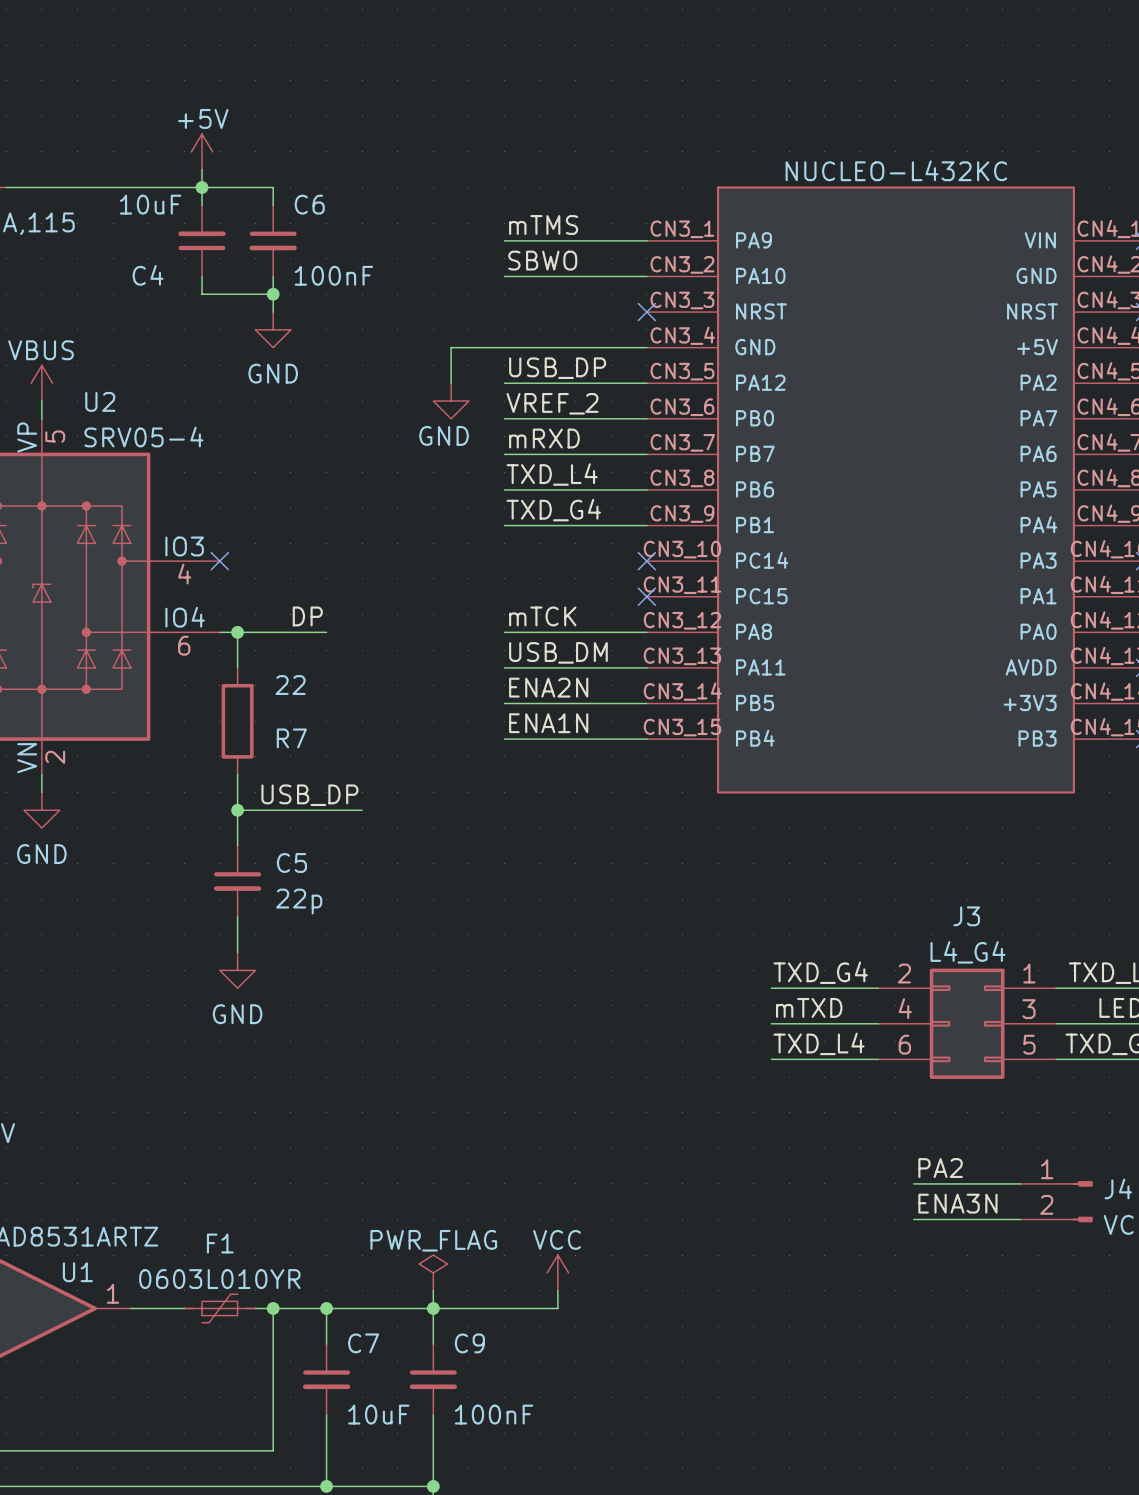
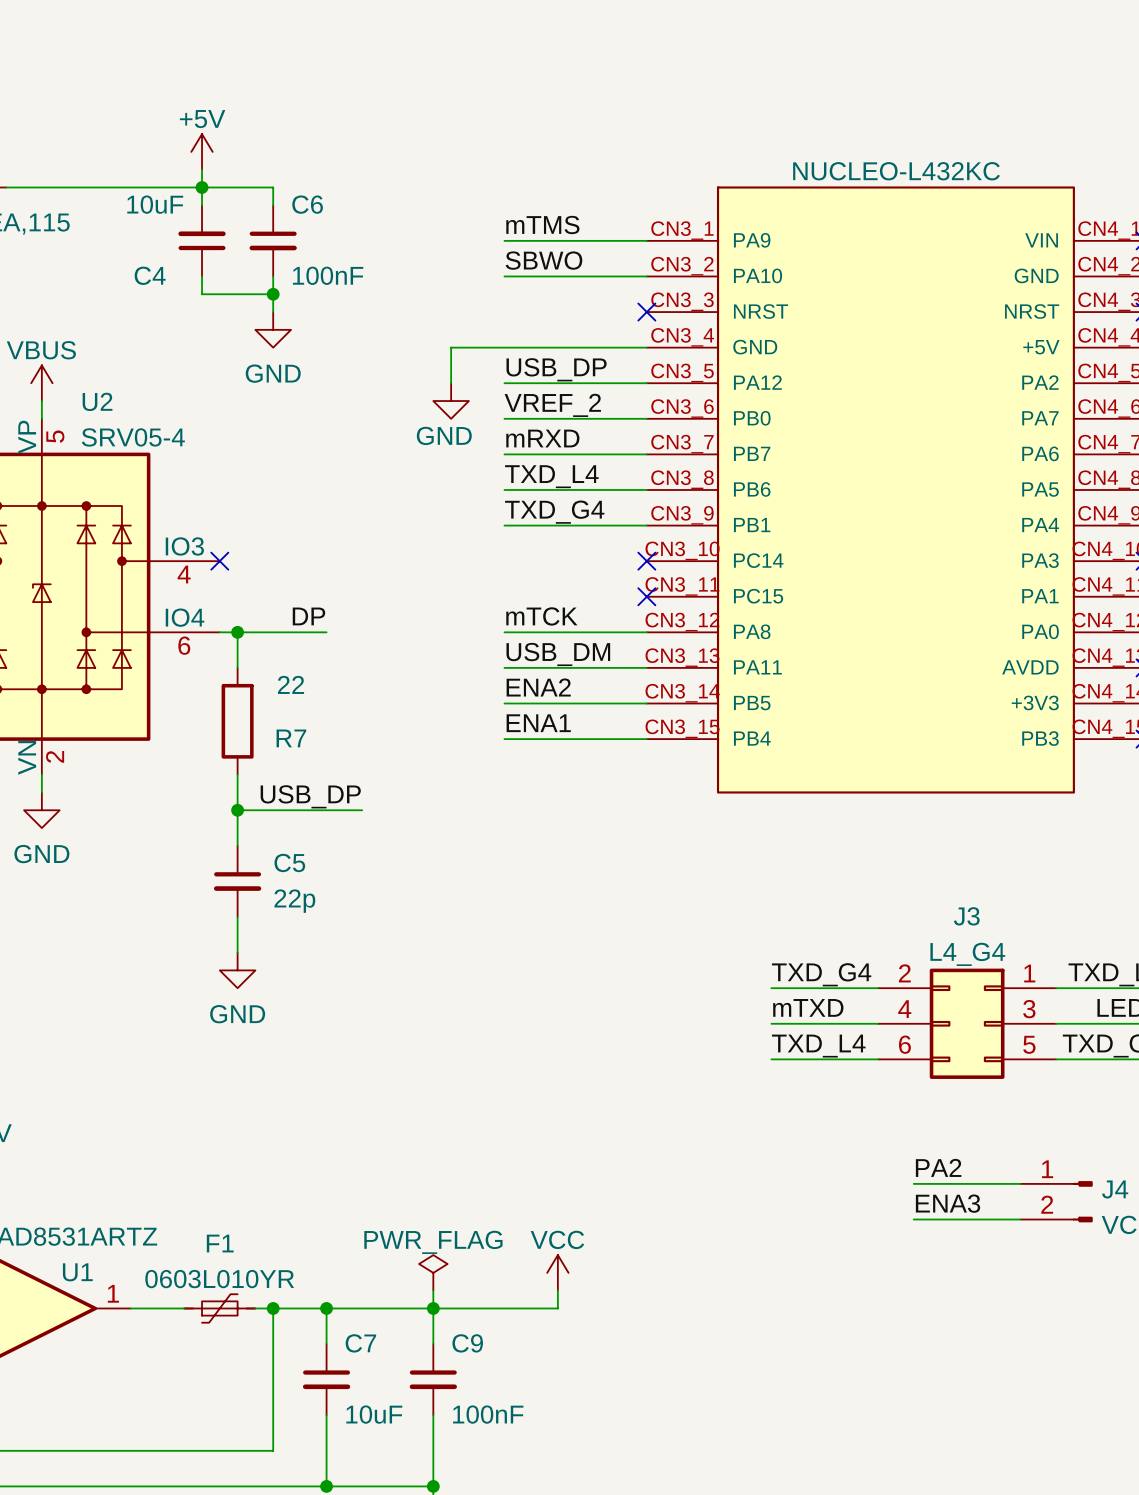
label: ENA2N (548, 687) -> ENA2 (538, 687)
label: ENA1N (548, 723) -> ENA1 (538, 723)
label: ENA3N (957, 1203) -> ENA3 (948, 1203)

